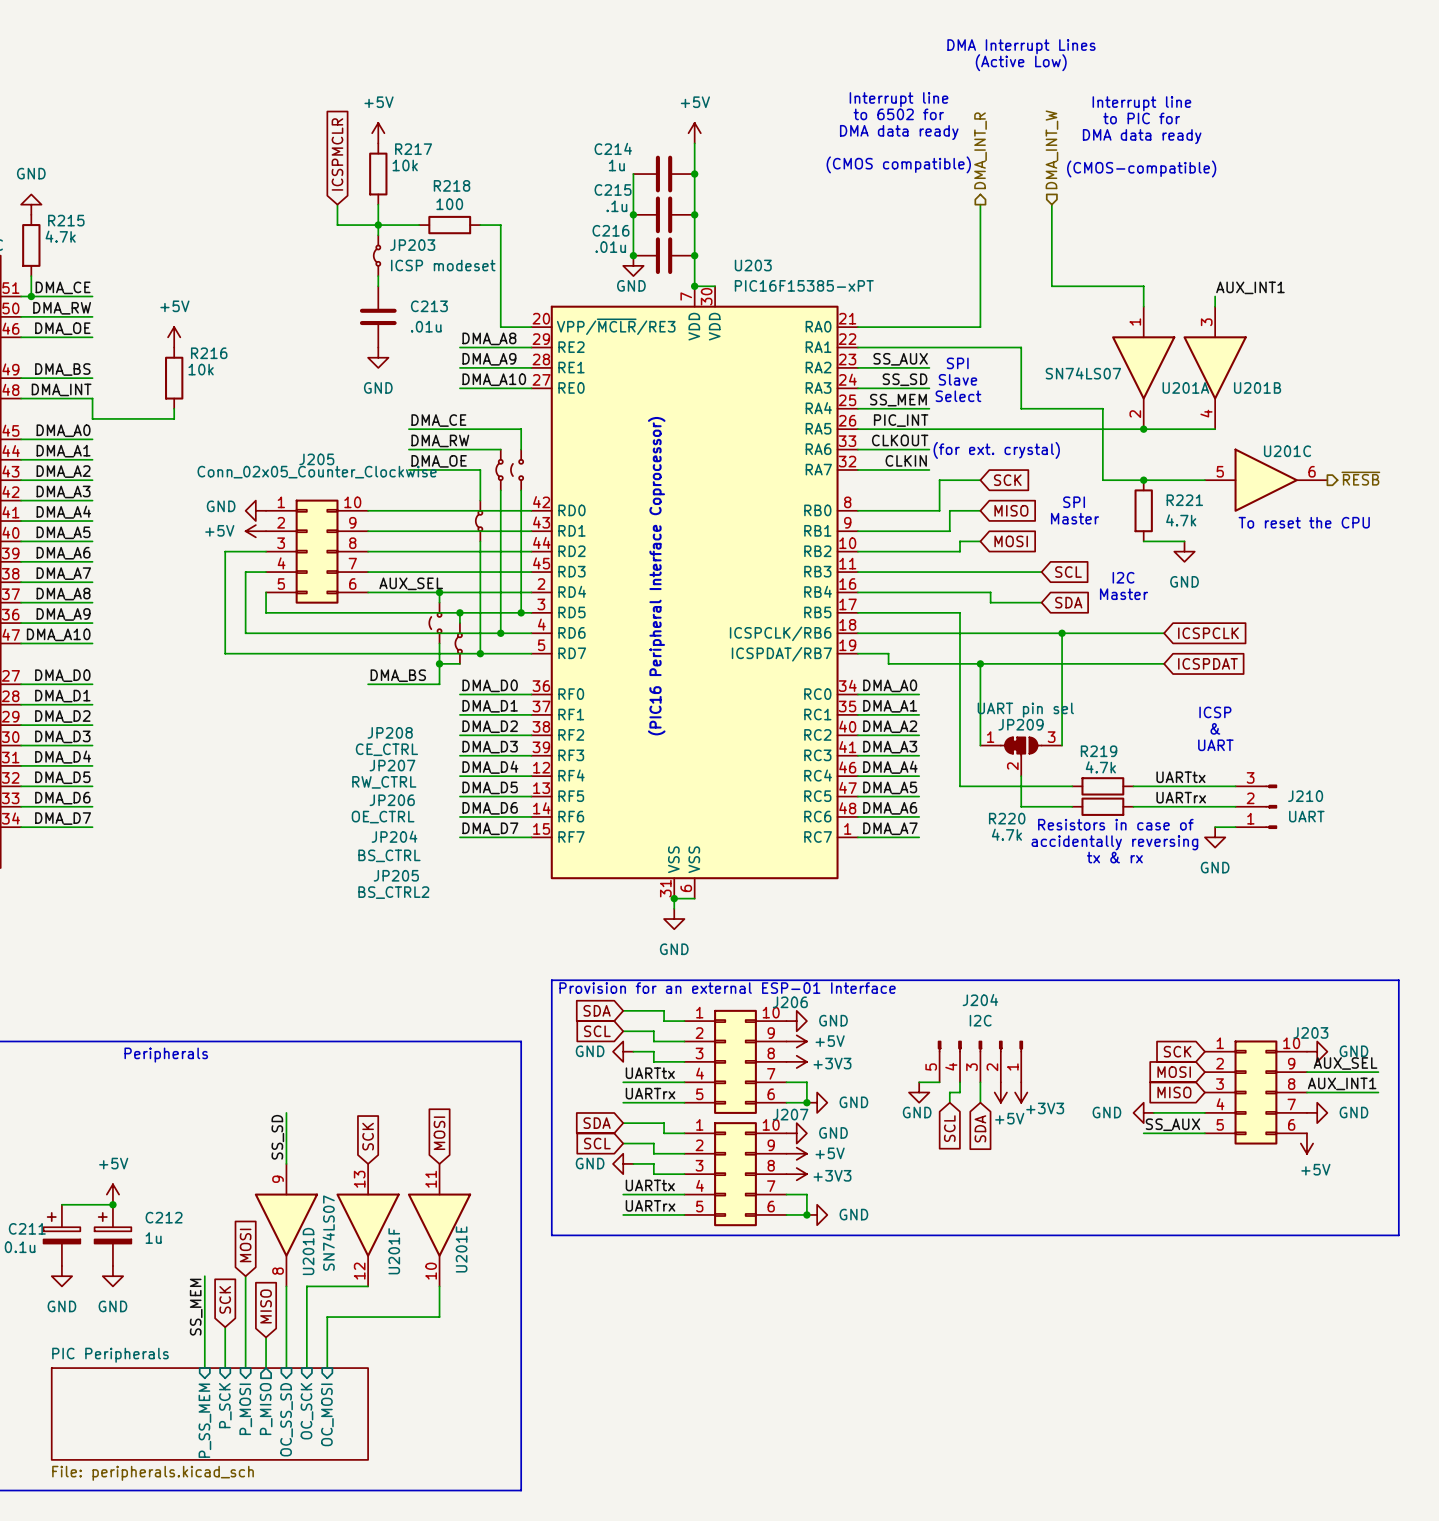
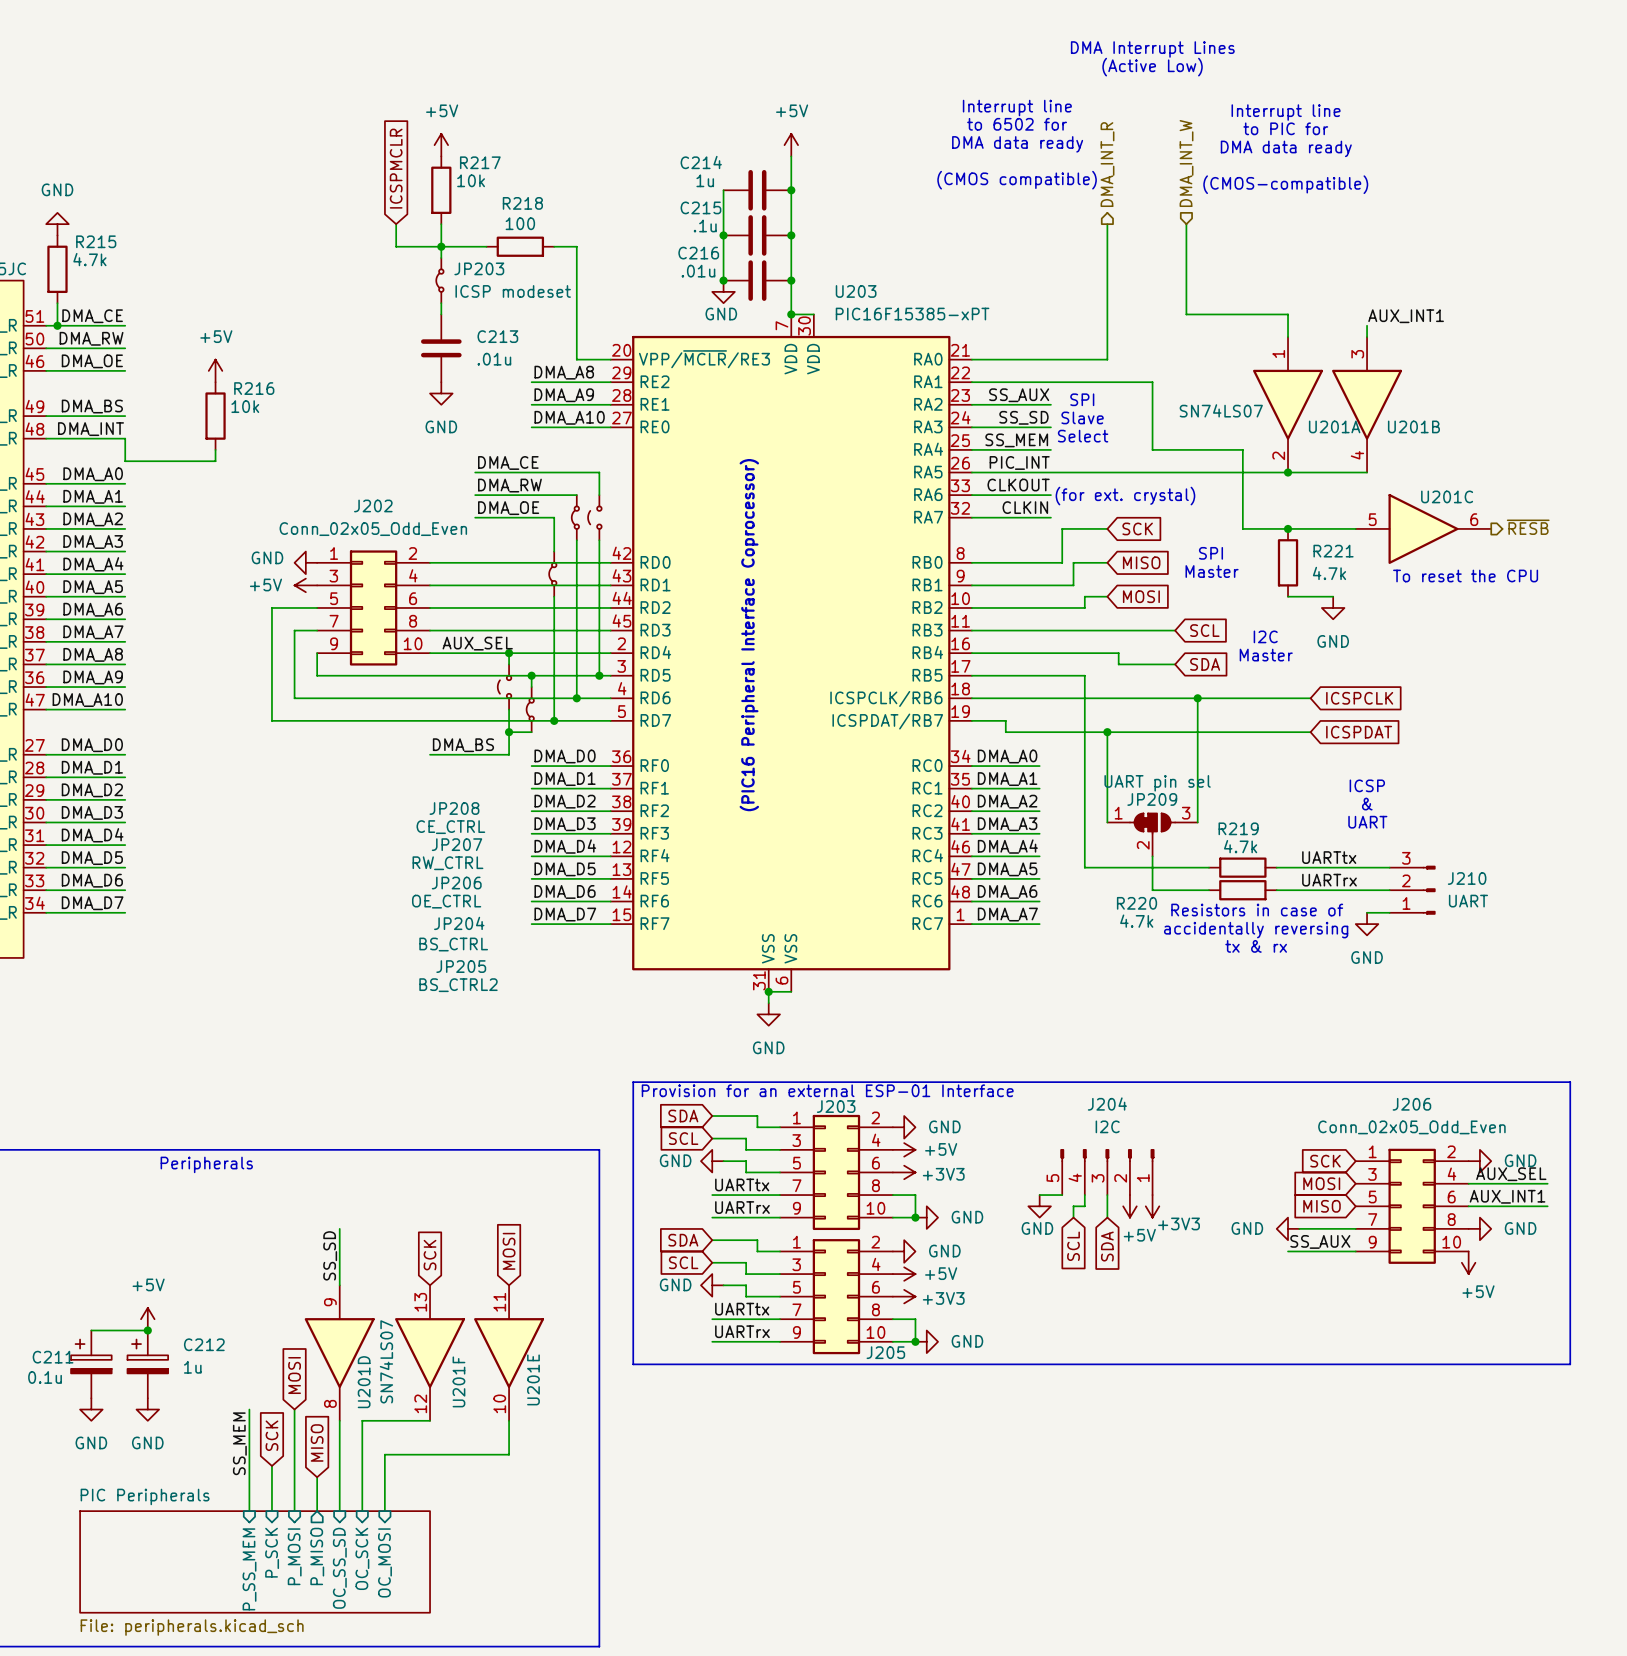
J205 name position: J205 (316, 459) -> J205 (885, 1352)
J205 value: Conn_02x05_Counter_Clockwise (317, 472) -> none
J205 symbol: [266, 499, 369, 604] -> [780, 1239, 893, 1355]
J202: none -> Conn_02x05_Odd_Even (373, 607)
J206 name position: J206 (790, 1002) -> J206 (1411, 1104)
J206 symbol: [684, 1009, 787, 1114] -> [1355, 1148, 1469, 1264]
J206 value: none -> Conn_02x05_Odd_Even (1411, 1127)
J203 name position: J203 (1310, 1032) -> J203 (836, 1106)
J203 symbol: [1204, 1040, 1307, 1145] -> [780, 1114, 893, 1231]
J207: (735, 1174) -> none

